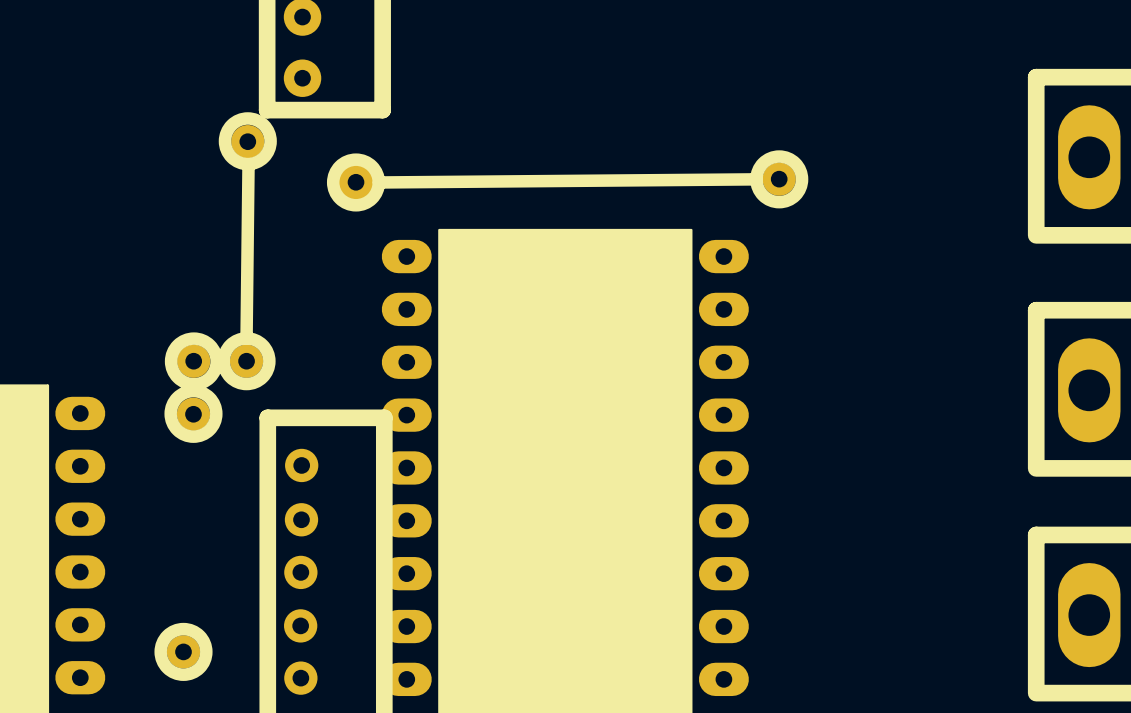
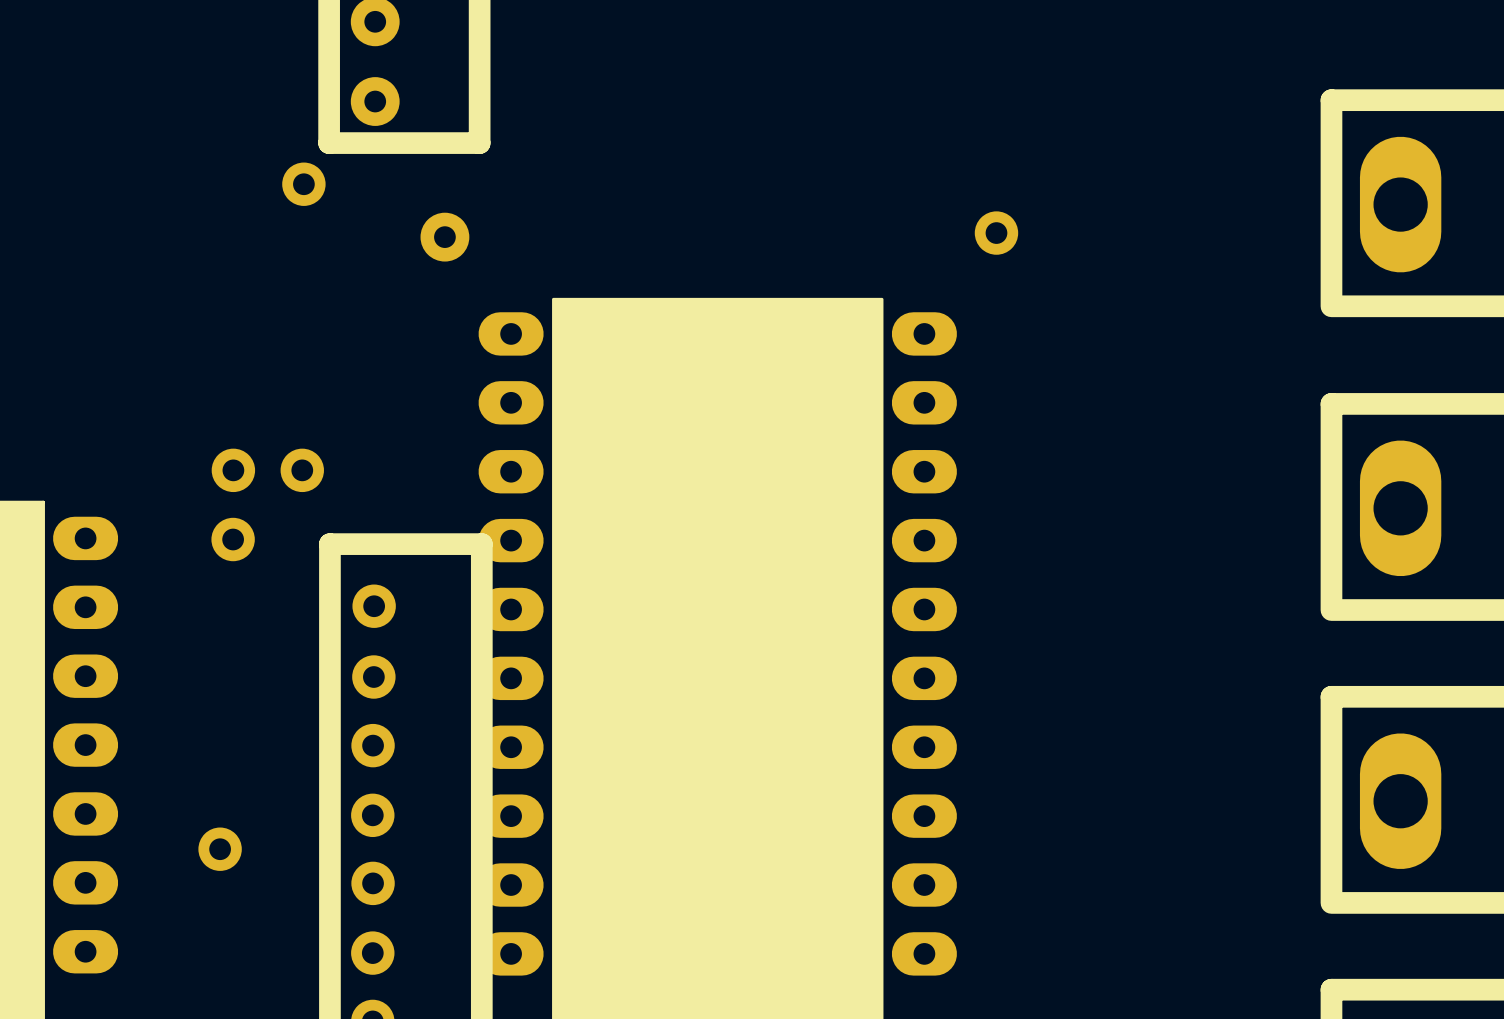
drawing: [218, 112, 277, 171] -> none
drawing: [750, 150, 809, 209] -> none
drawing: [326, 153, 386, 212] -> none
line: (248, 164) (246, 338) -> none
line: (756, 179) (378, 182) -> none
drawing: [164, 332, 276, 443] -> none
drawing: [154, 622, 213, 681] -> none

